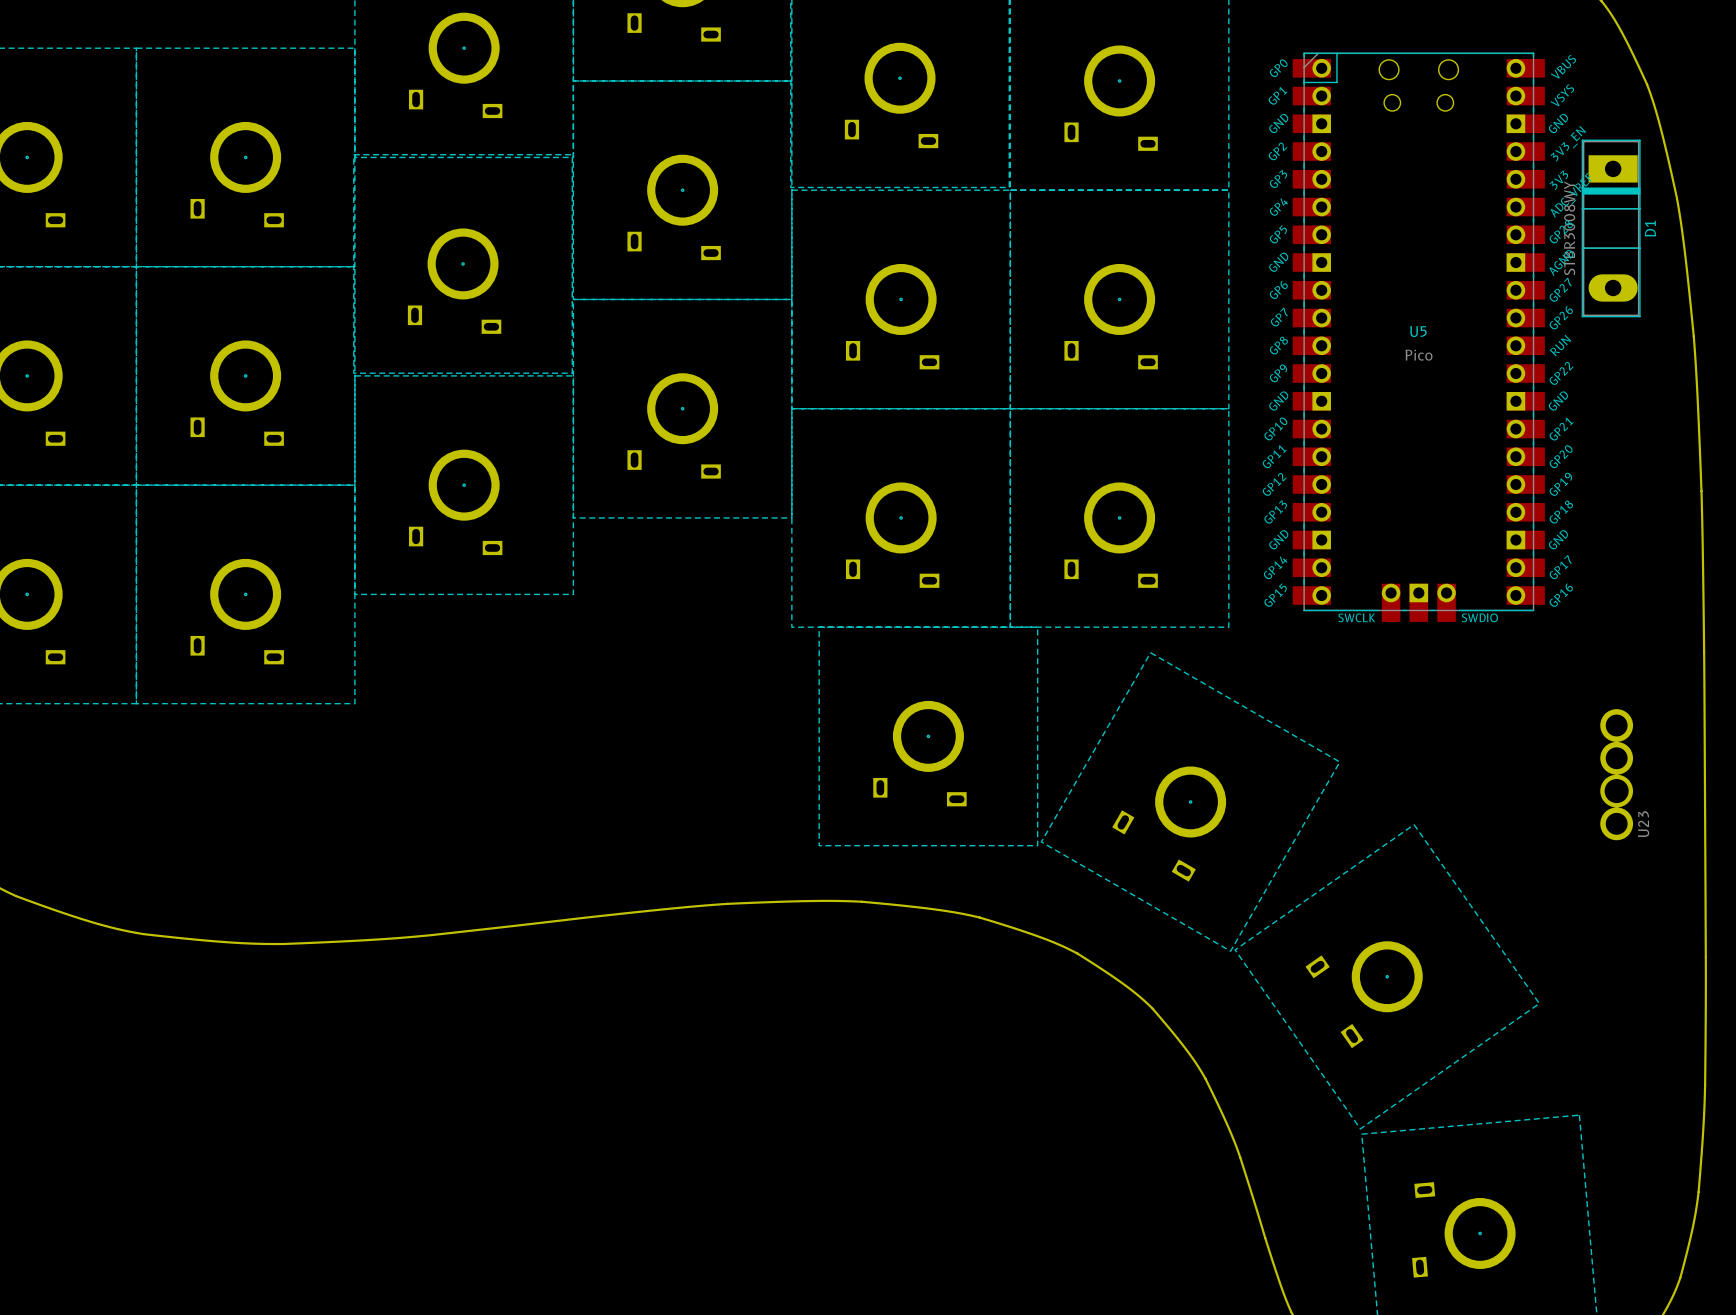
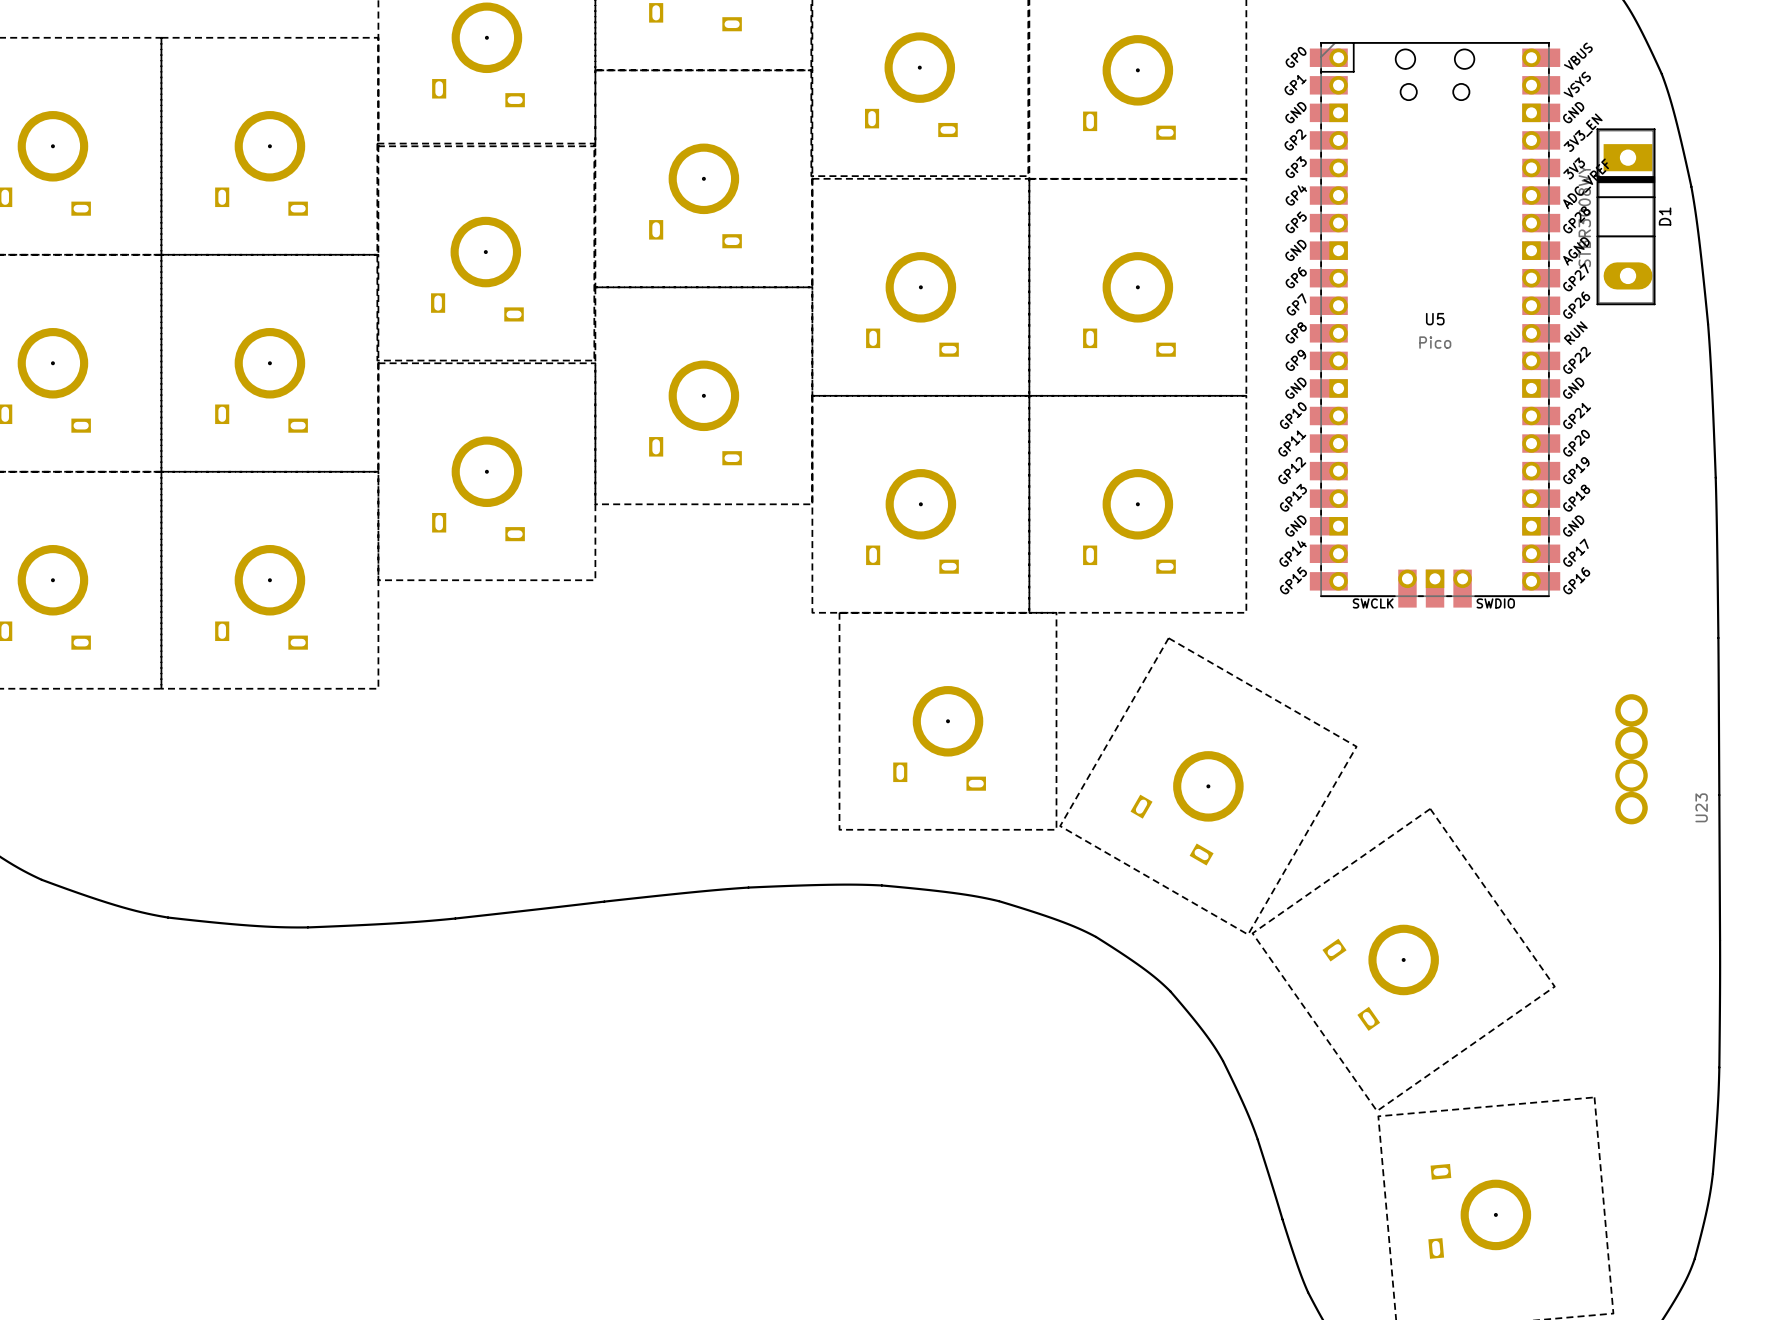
U23 name position: U23 (1643, 824) -> U23 (1701, 807)

